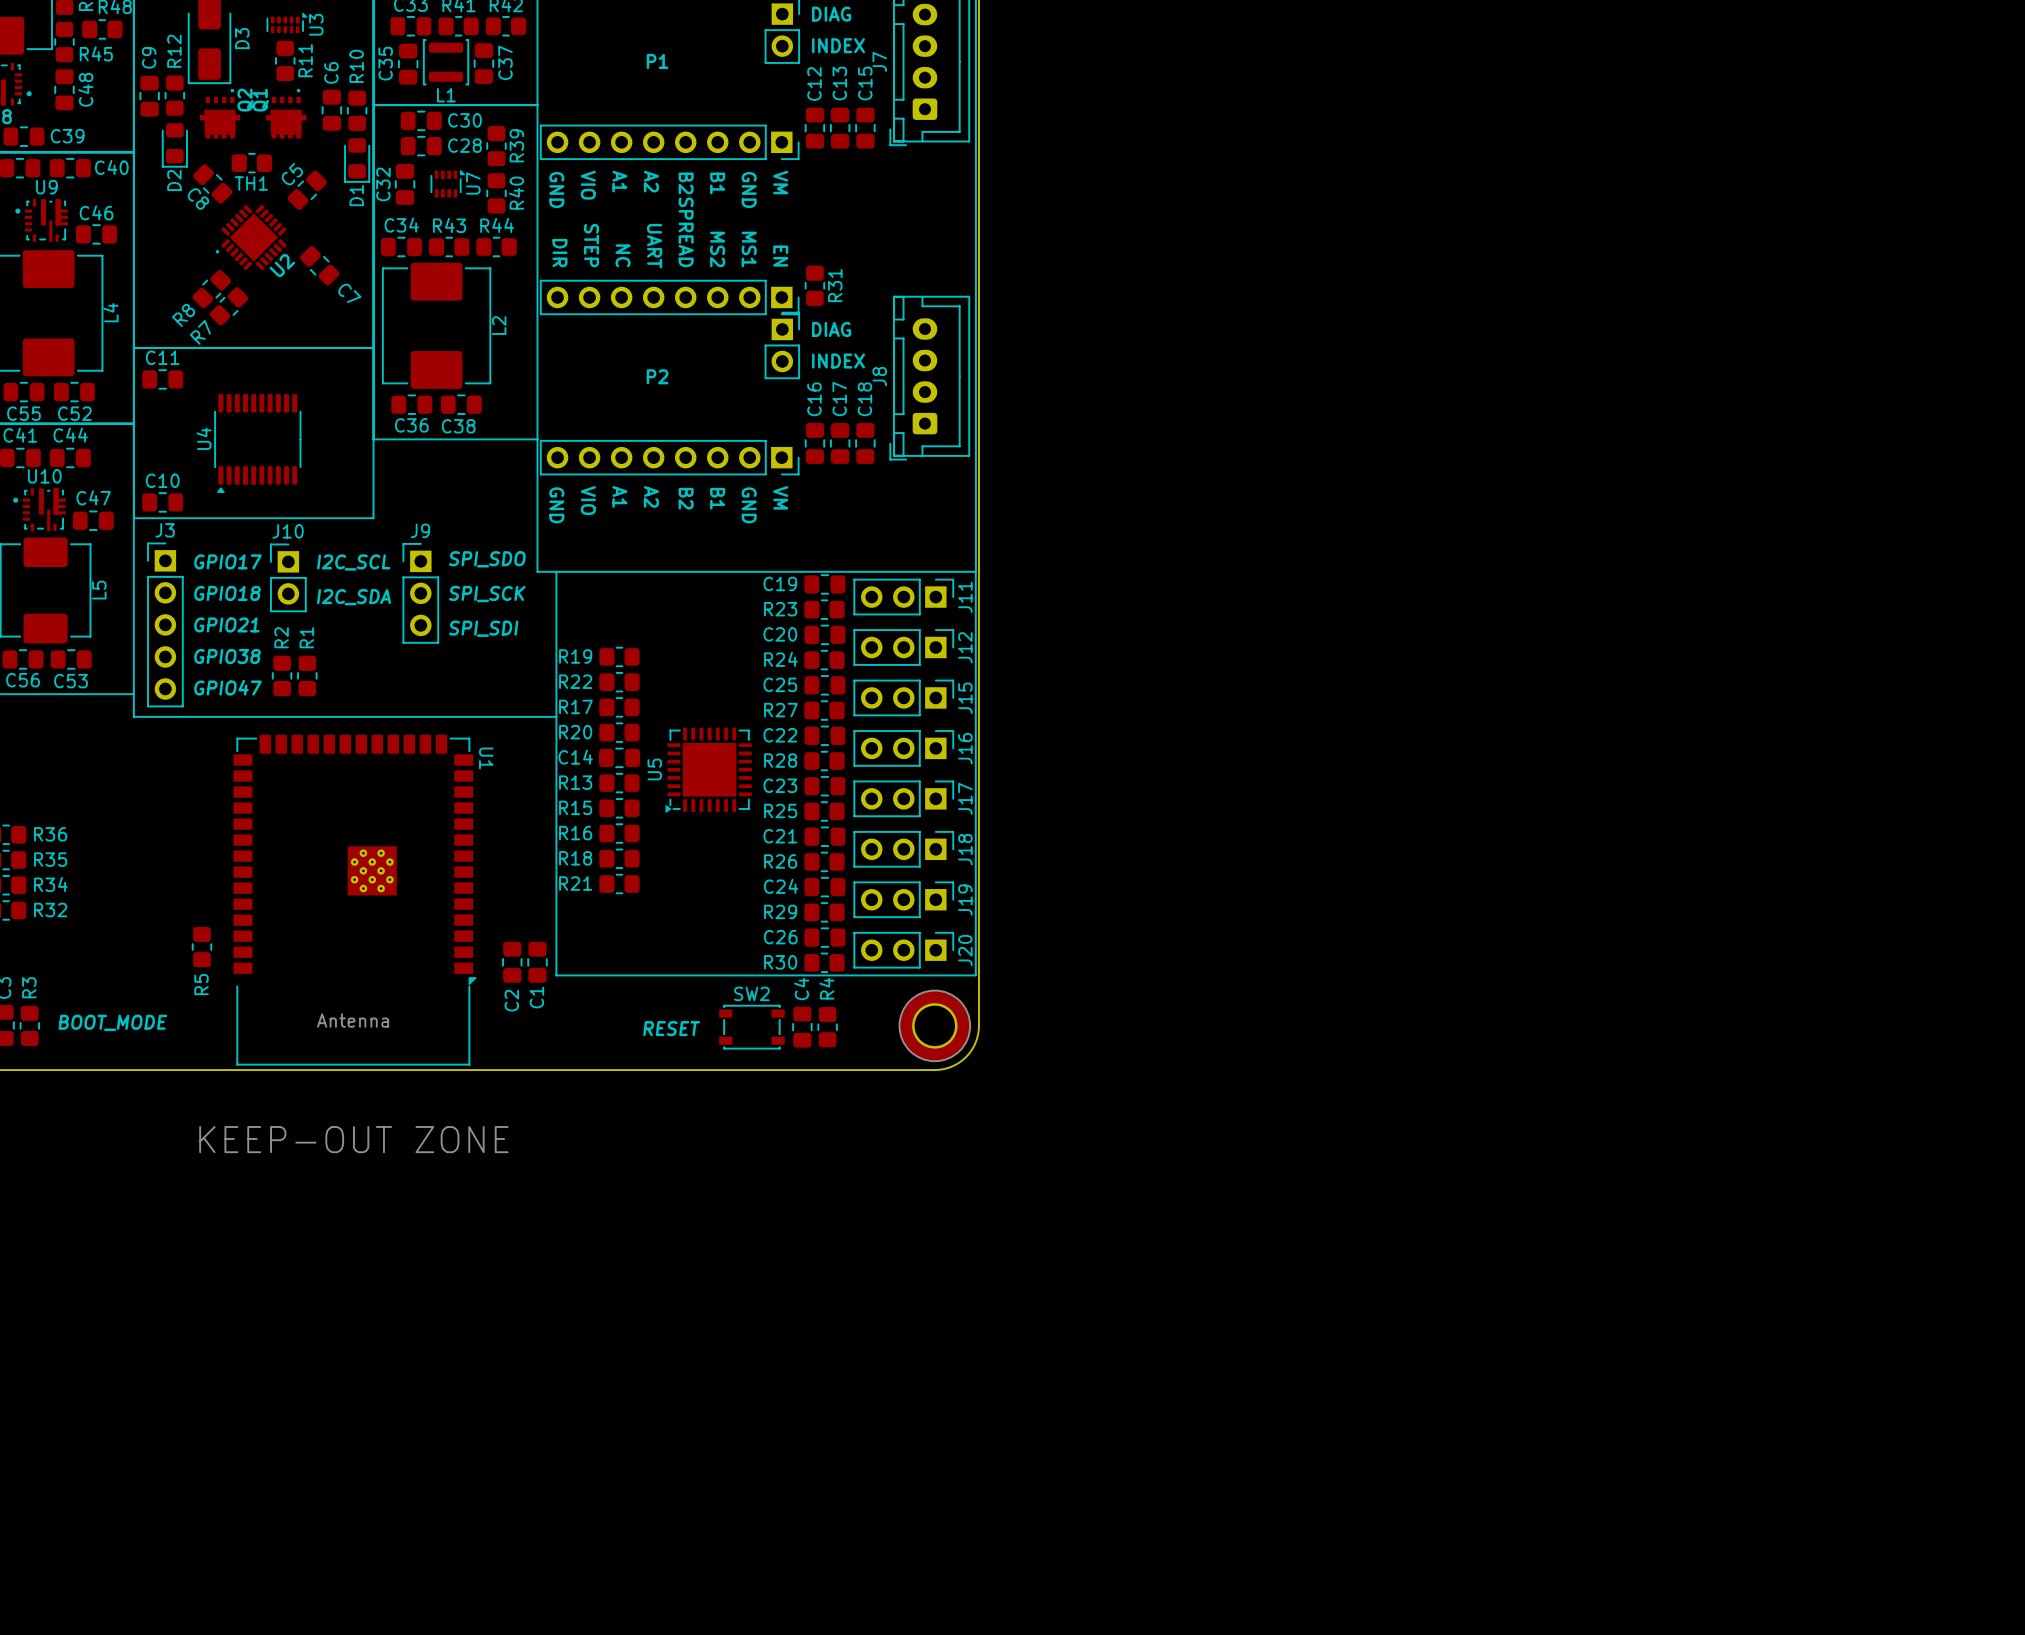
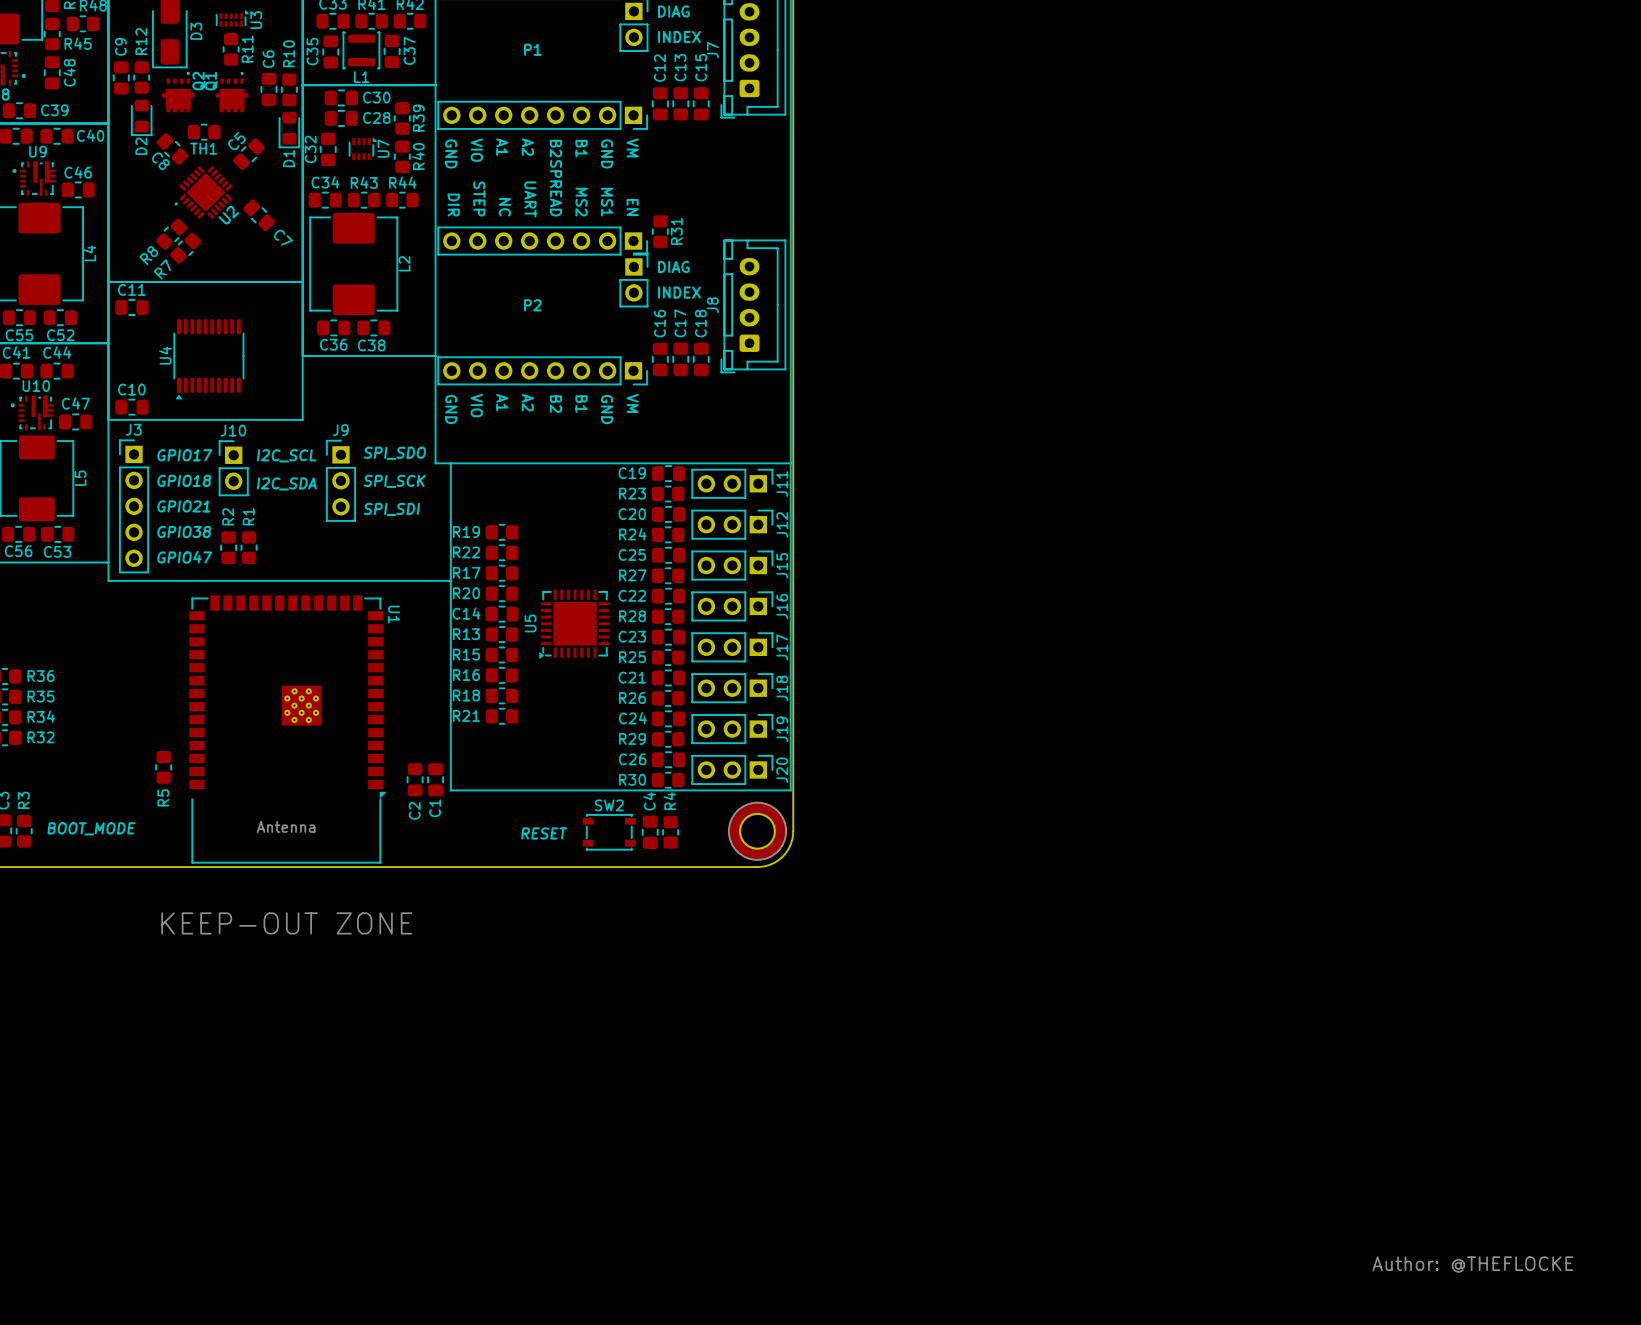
text: none -> Author: @THEFLOCKE (1472, 1264)

